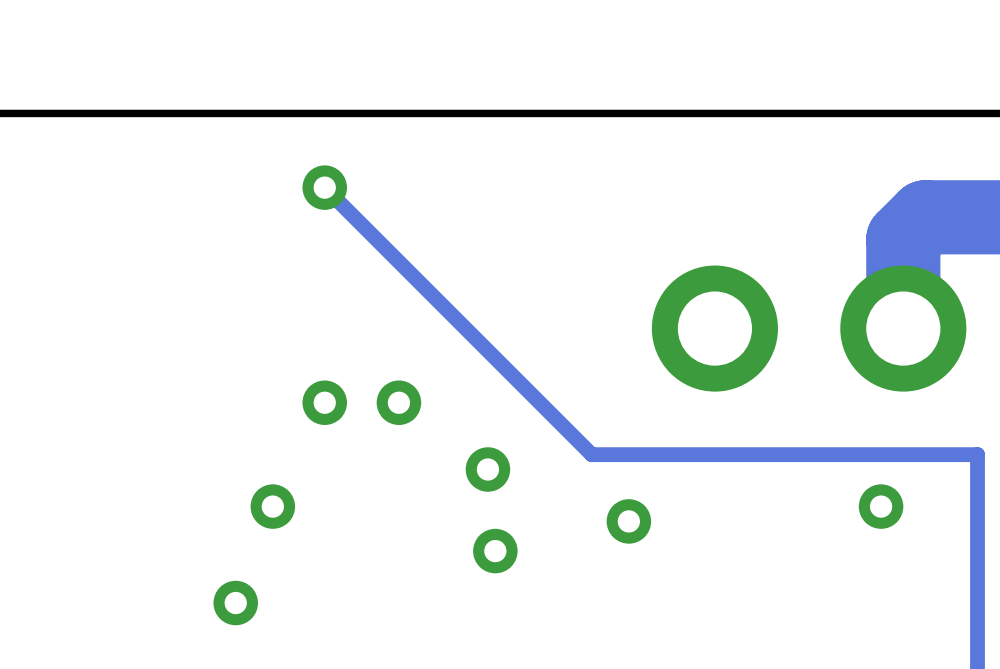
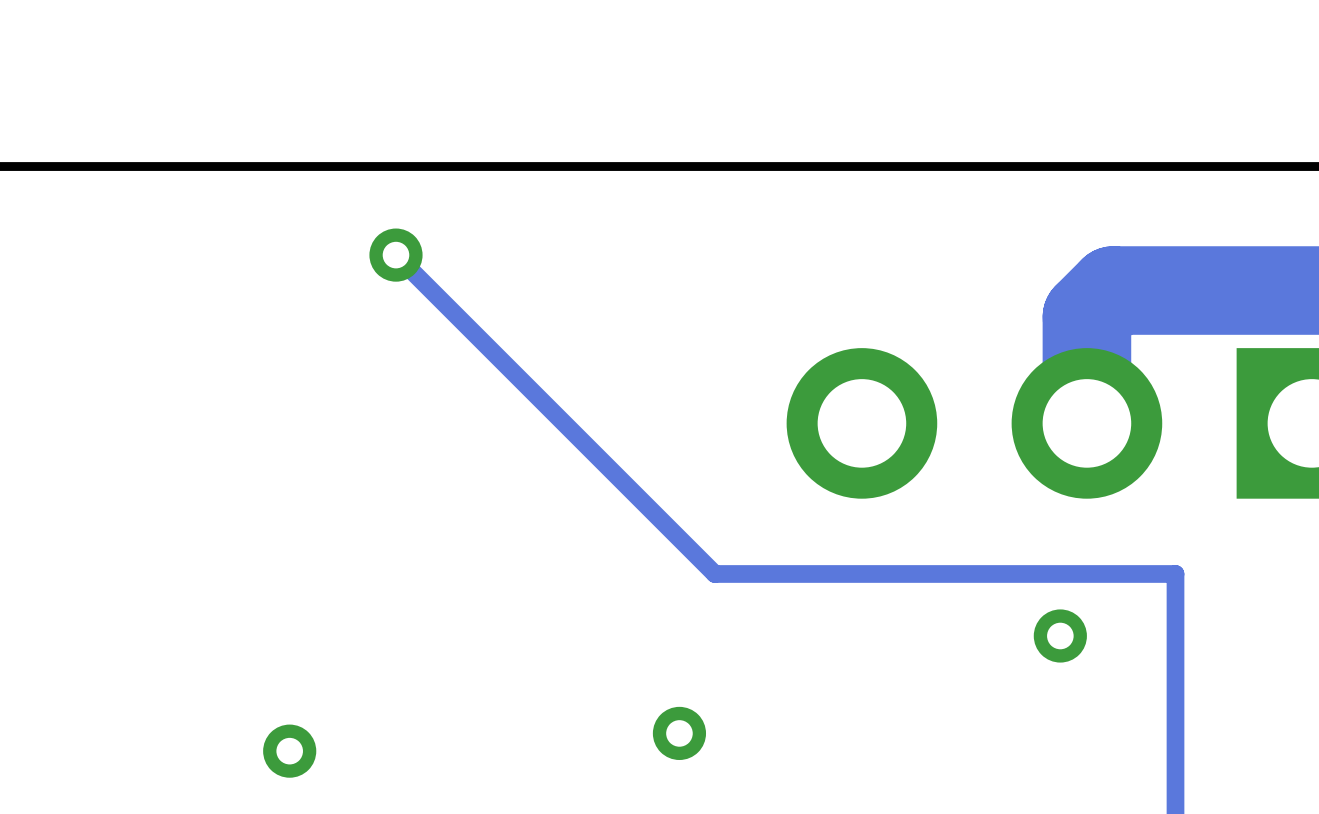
via: (324, 402) -> none
via: (398, 402) -> none
via: (487, 469) -> none
via: (272, 506) -> none
via: (628, 521) -> none
via: (495, 551) -> none
via: none -> (679, 733)

